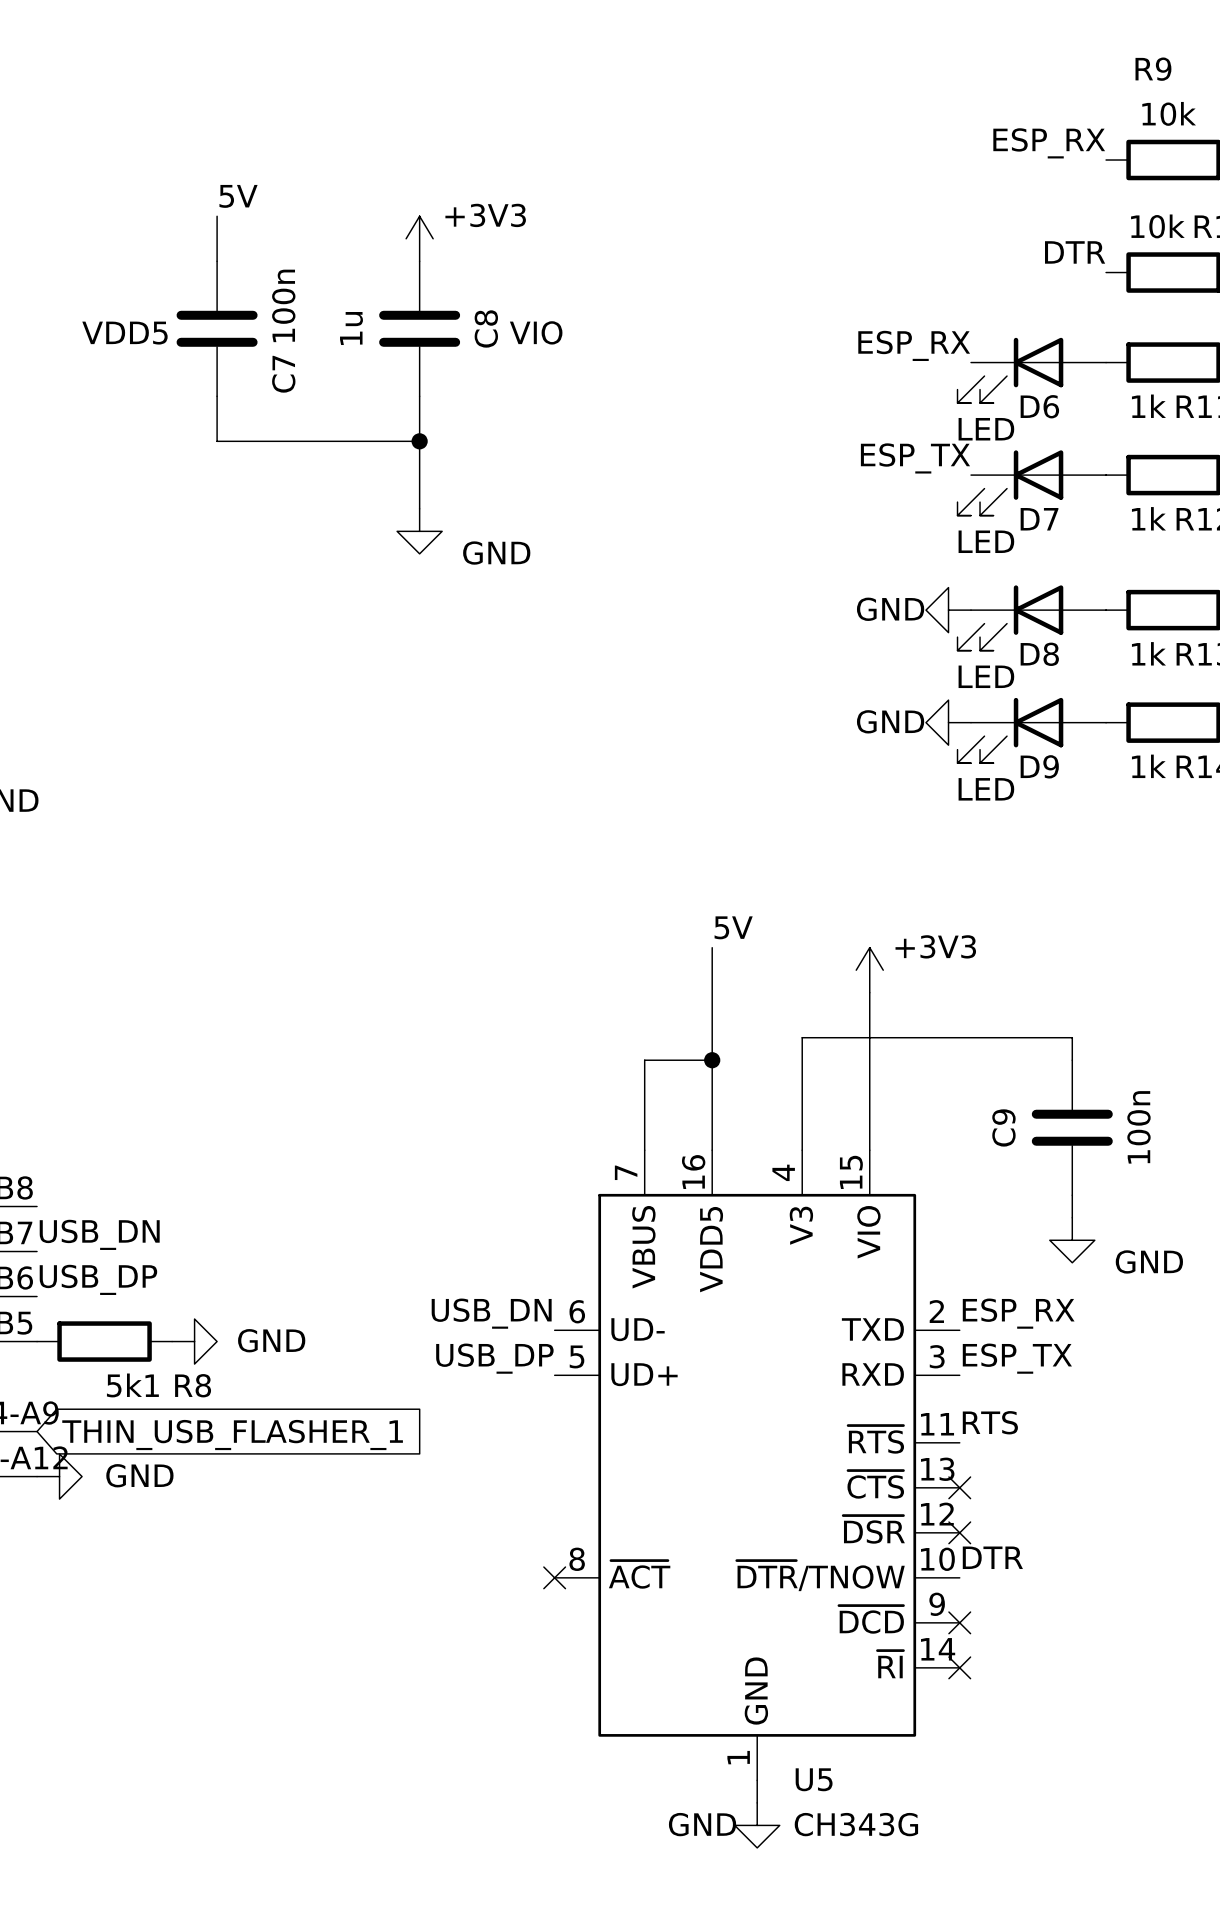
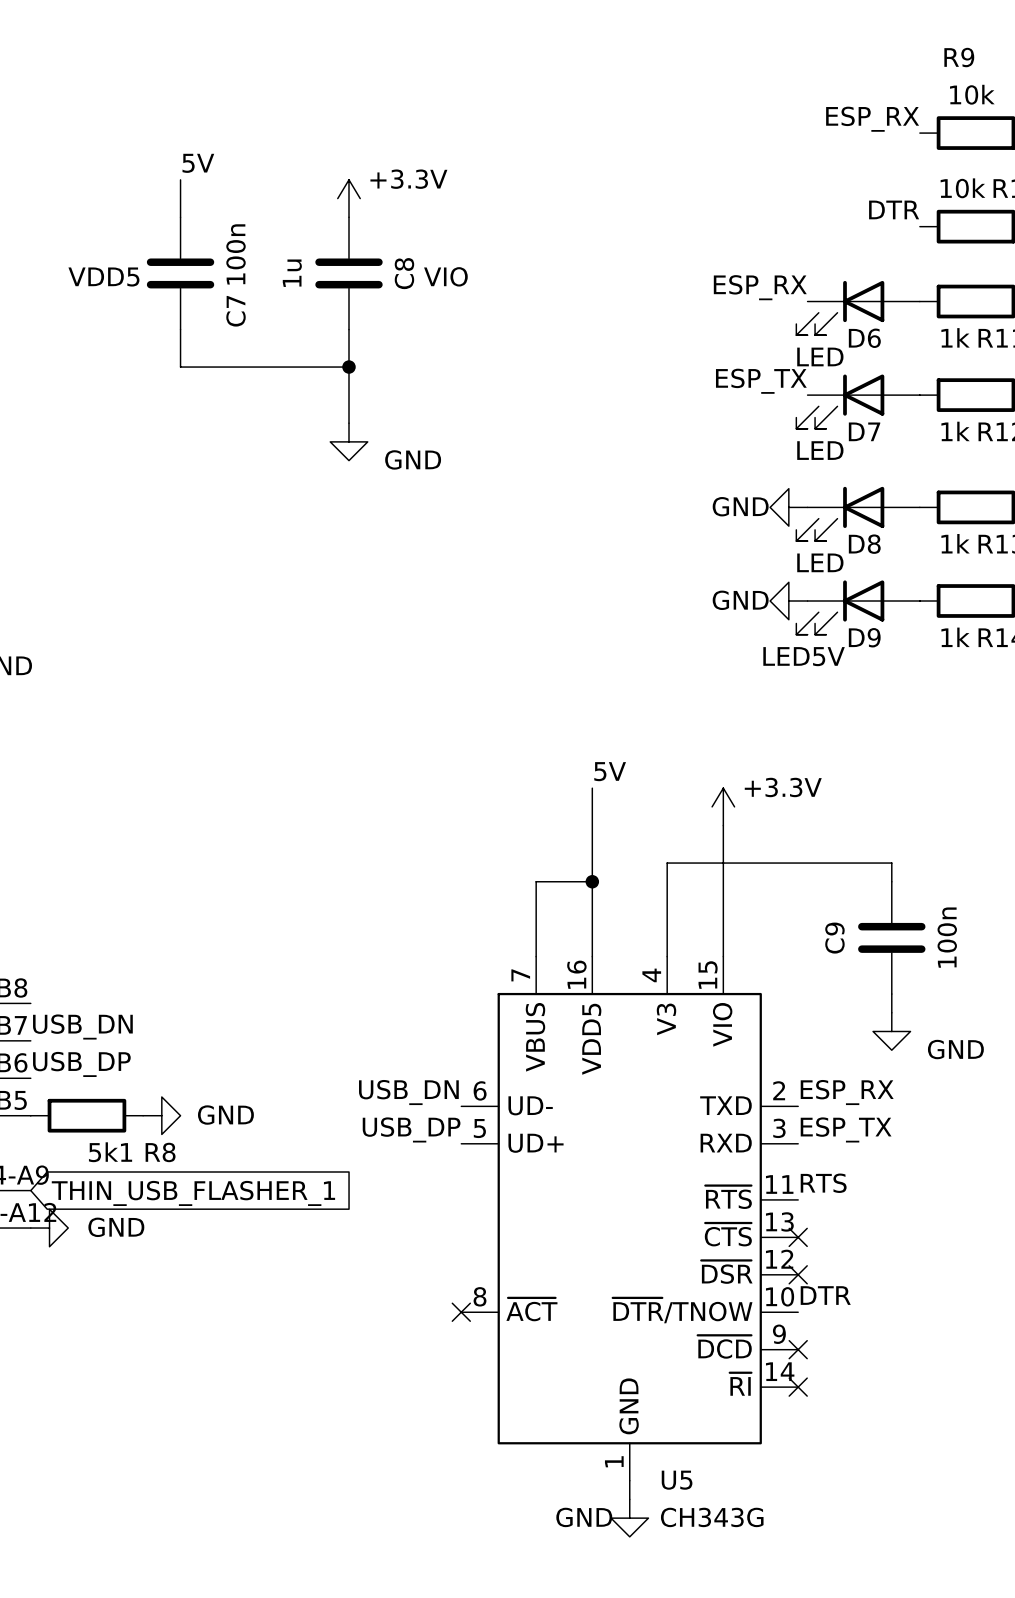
power symbol: +3V3 (419, 238) -> +3.3V (348, 198)
D9 value: LED (986, 789) -> LED5V (804, 656)
power symbol: +3V3 (869, 970) -> +3.3V (723, 806)

